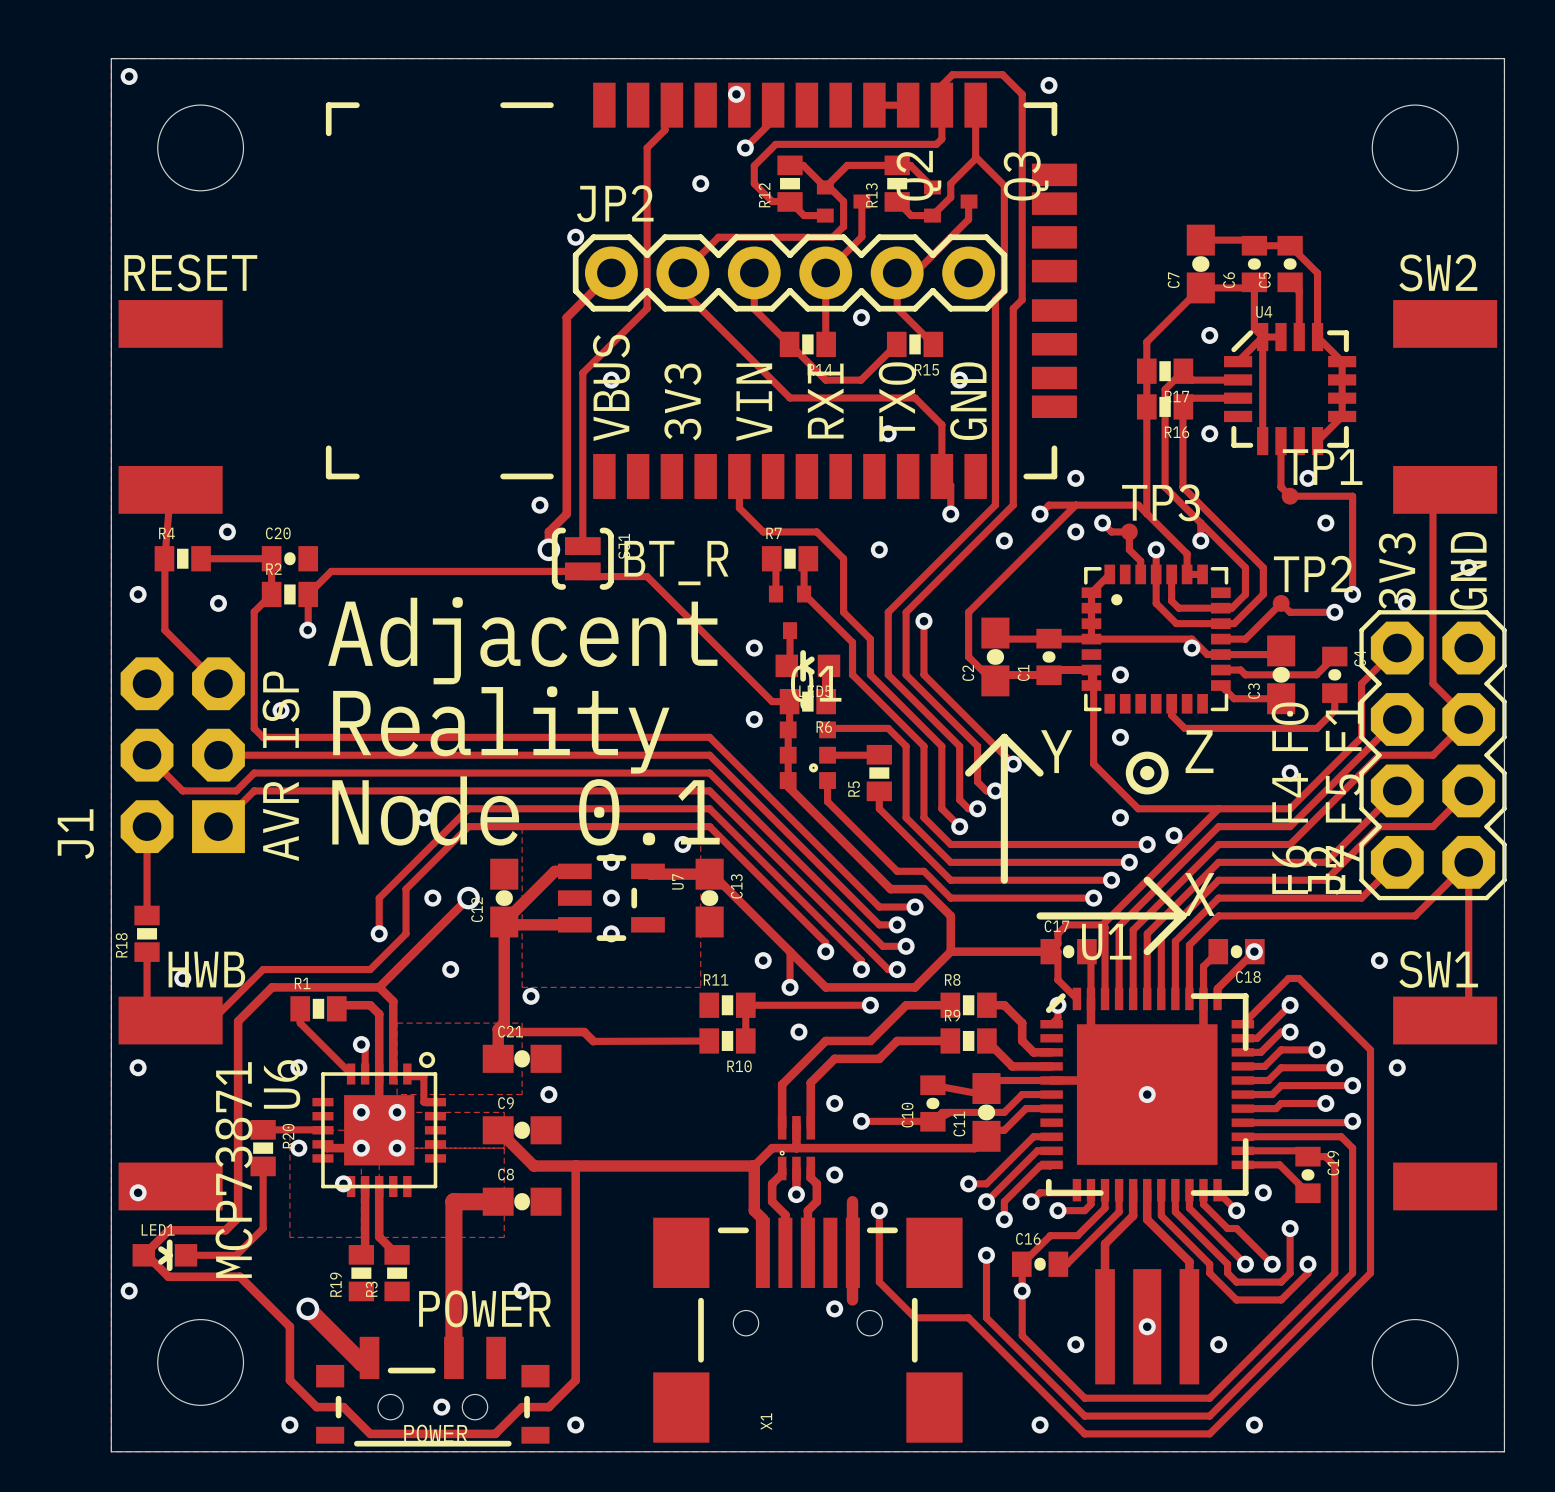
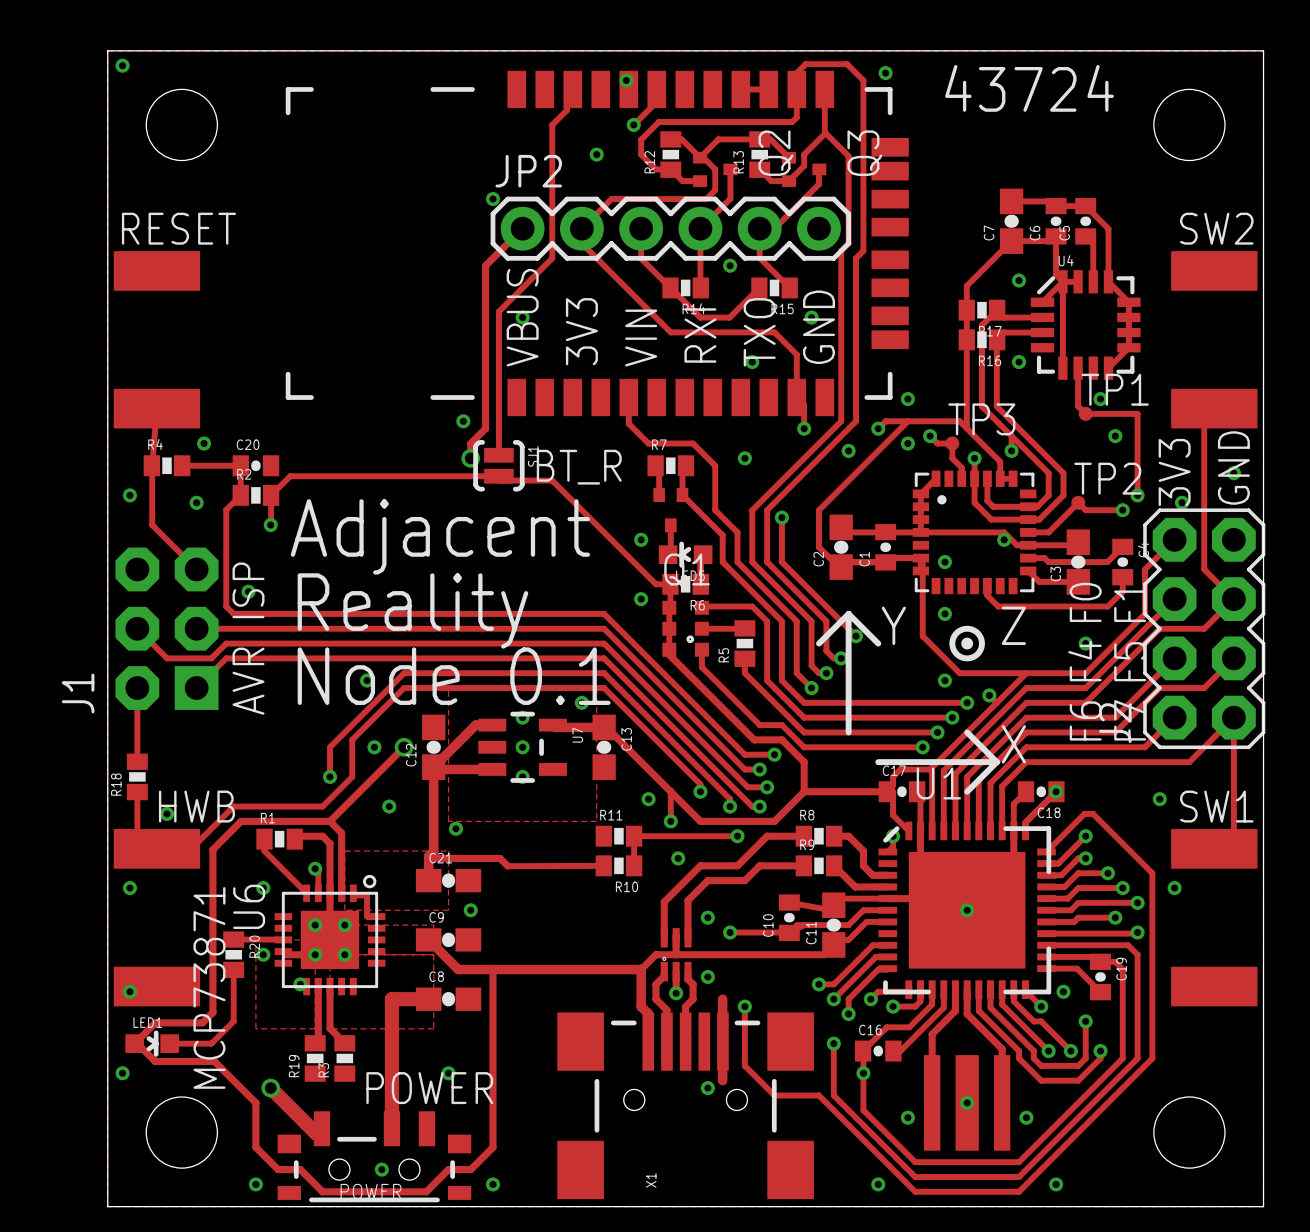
text: none -> 43724 (1029, 88)

